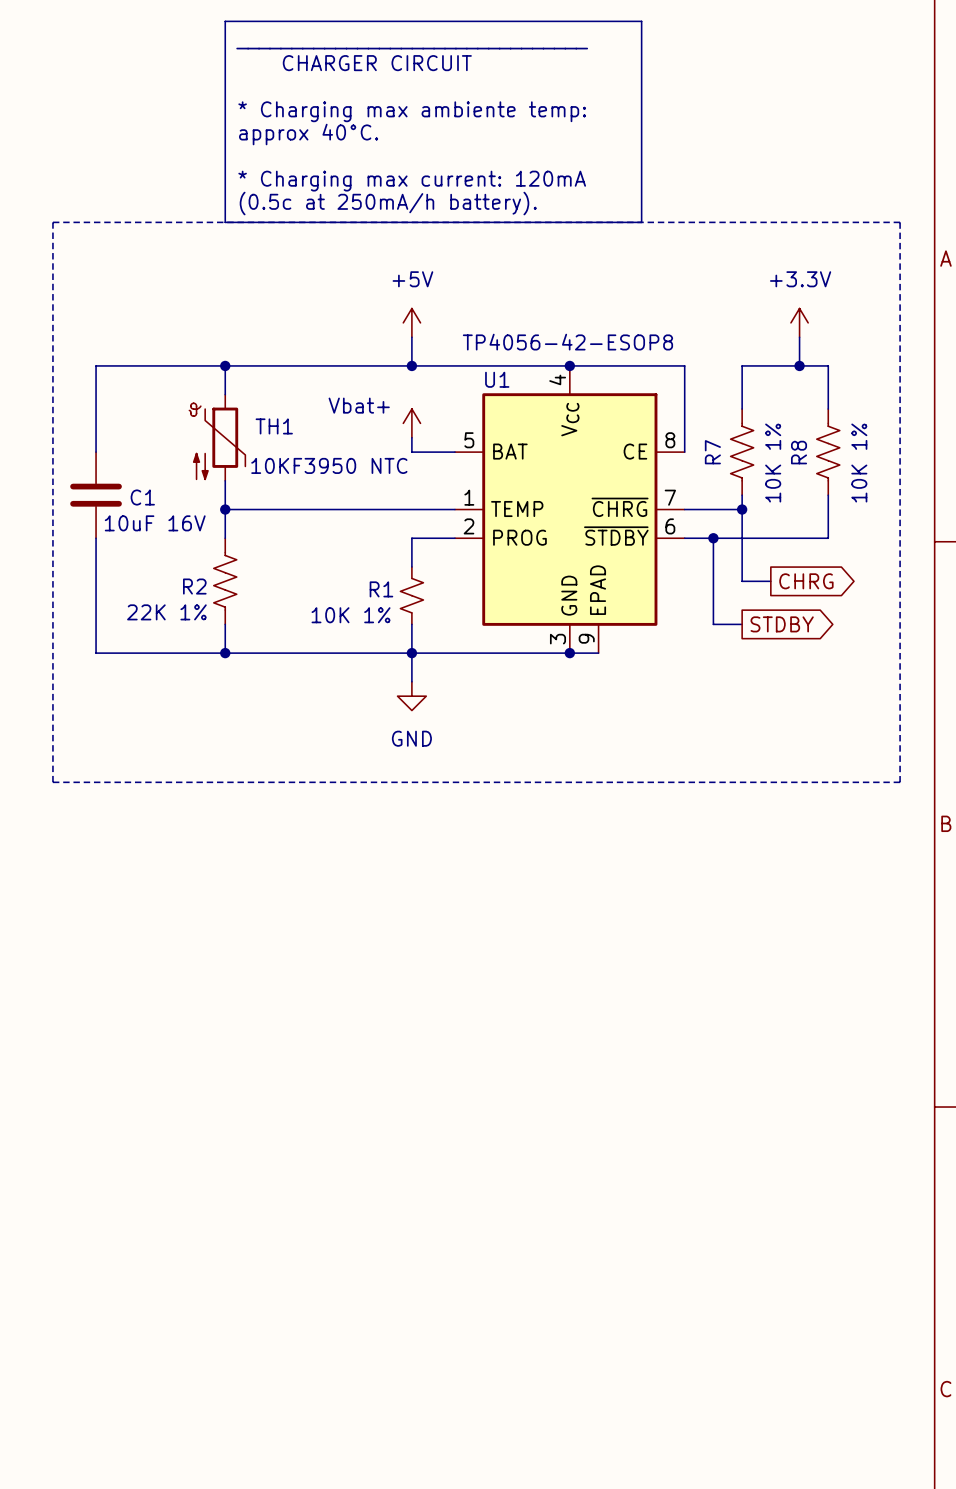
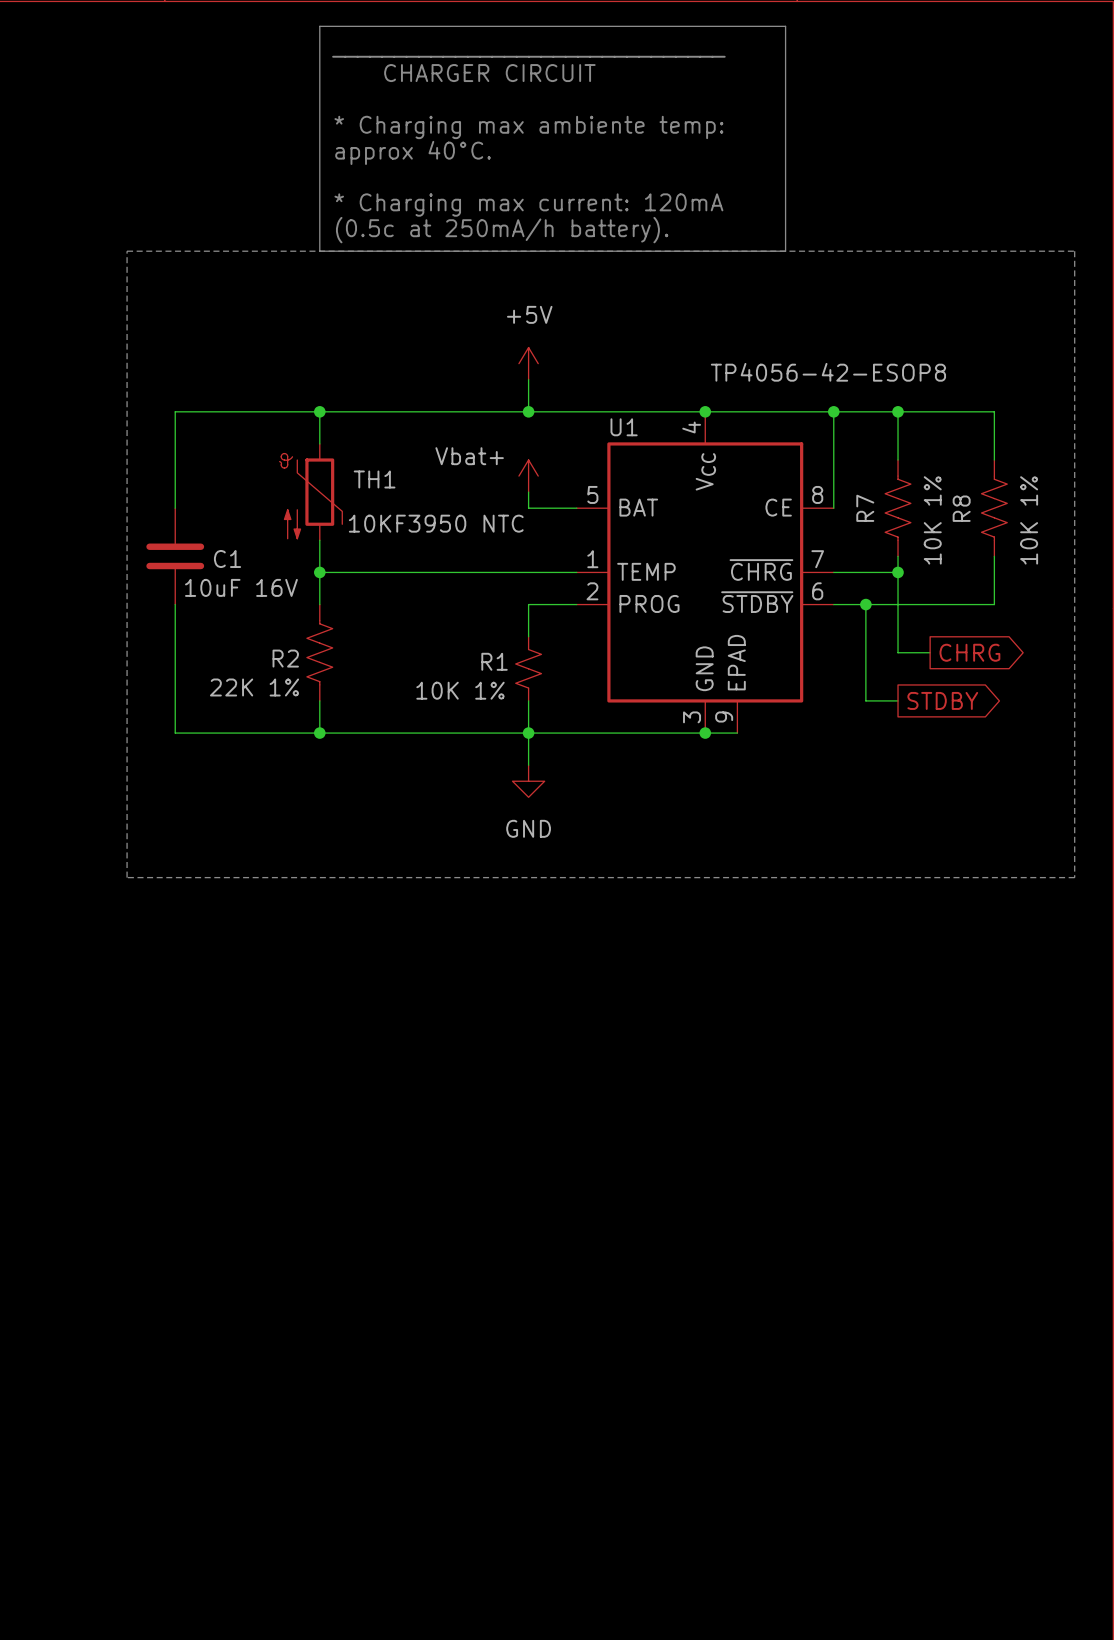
power symbol: +3.3V (799, 322) -> none
wire: (799, 337) (799, 365) -> none
U1 value position: TP4056-42-ESOP8 (567, 342) -> TP4056-42-ESOP8 (828, 372)
wire: none -> (833, 411) (898, 411)
junction: none -> (833, 411)
junction: none -> (898, 411)
junction: (799, 365) -> none

